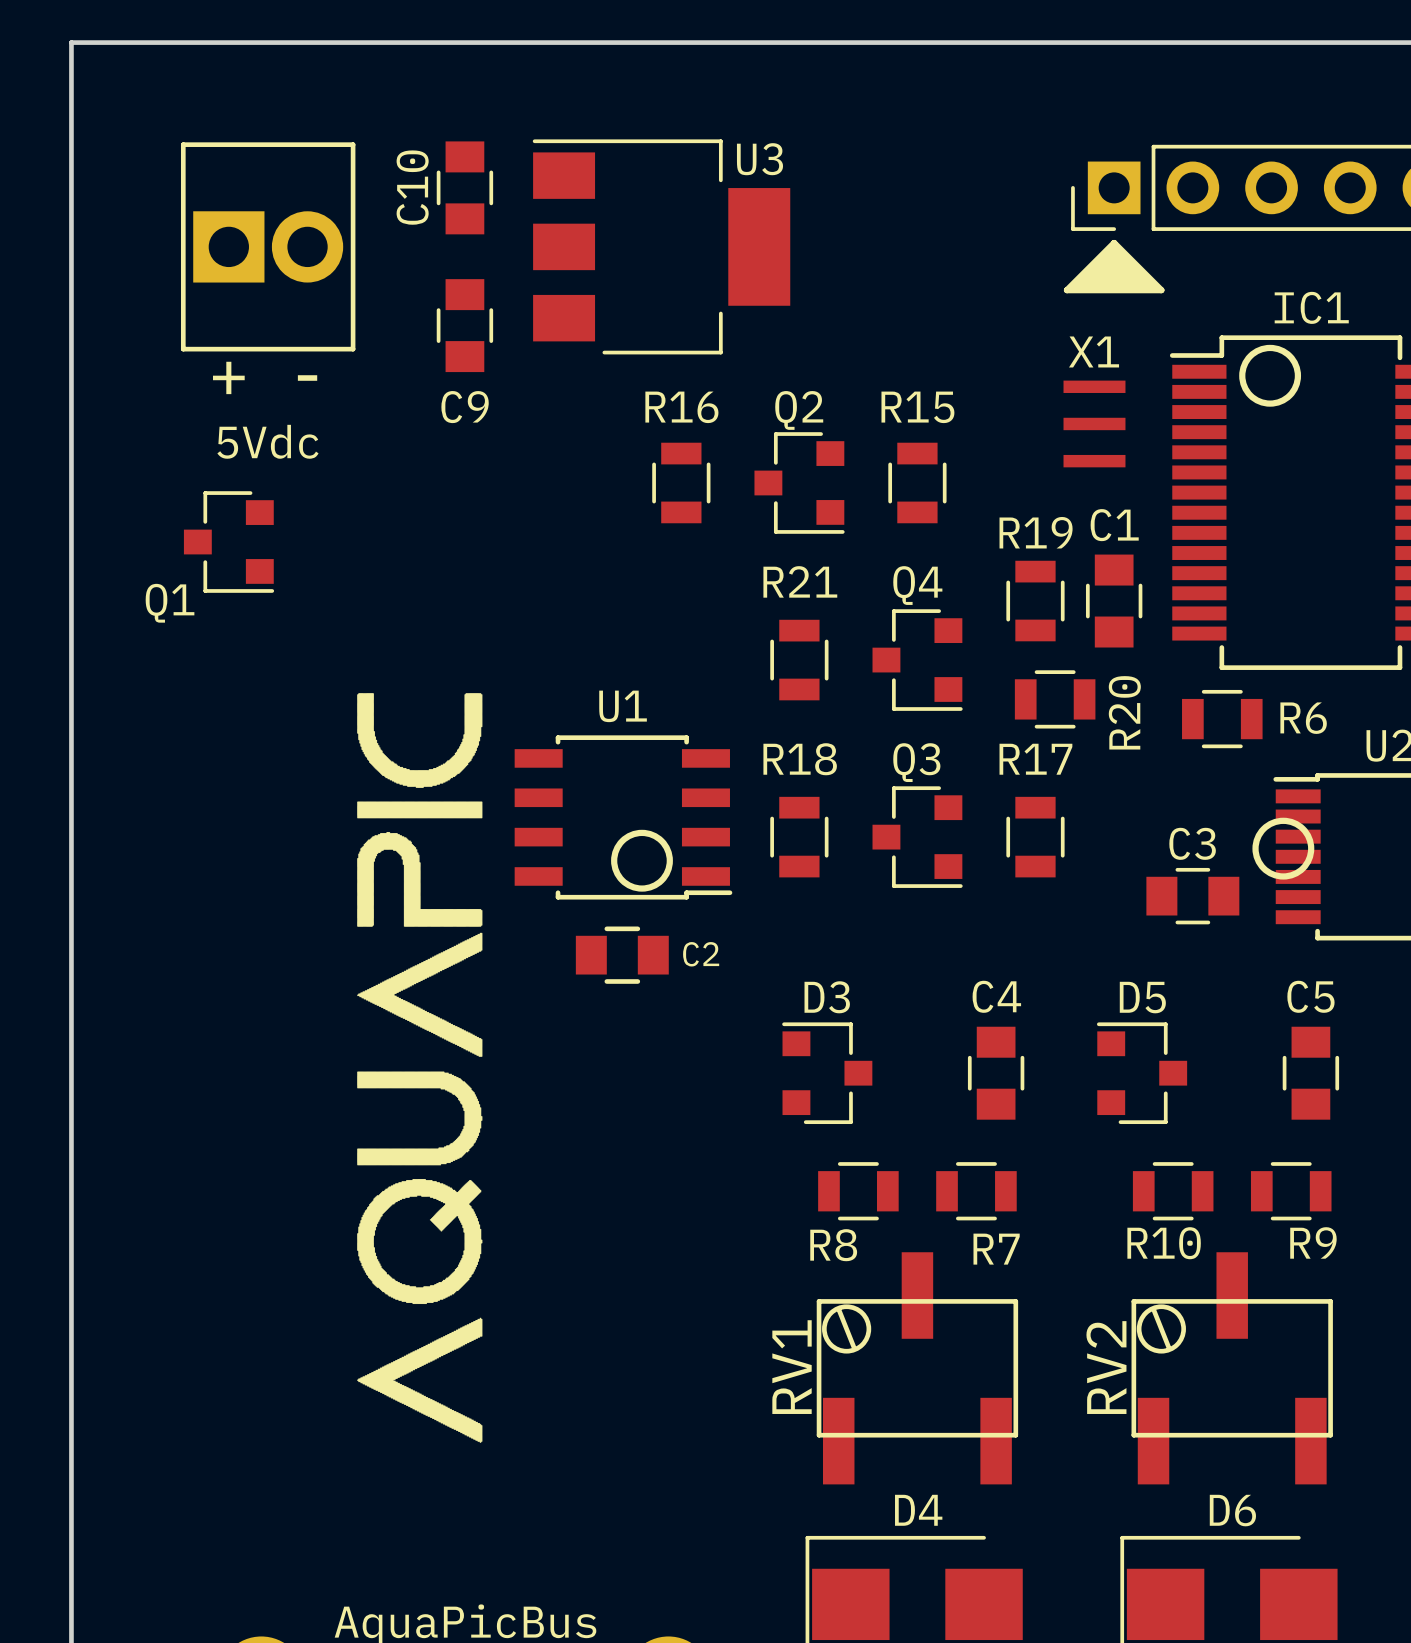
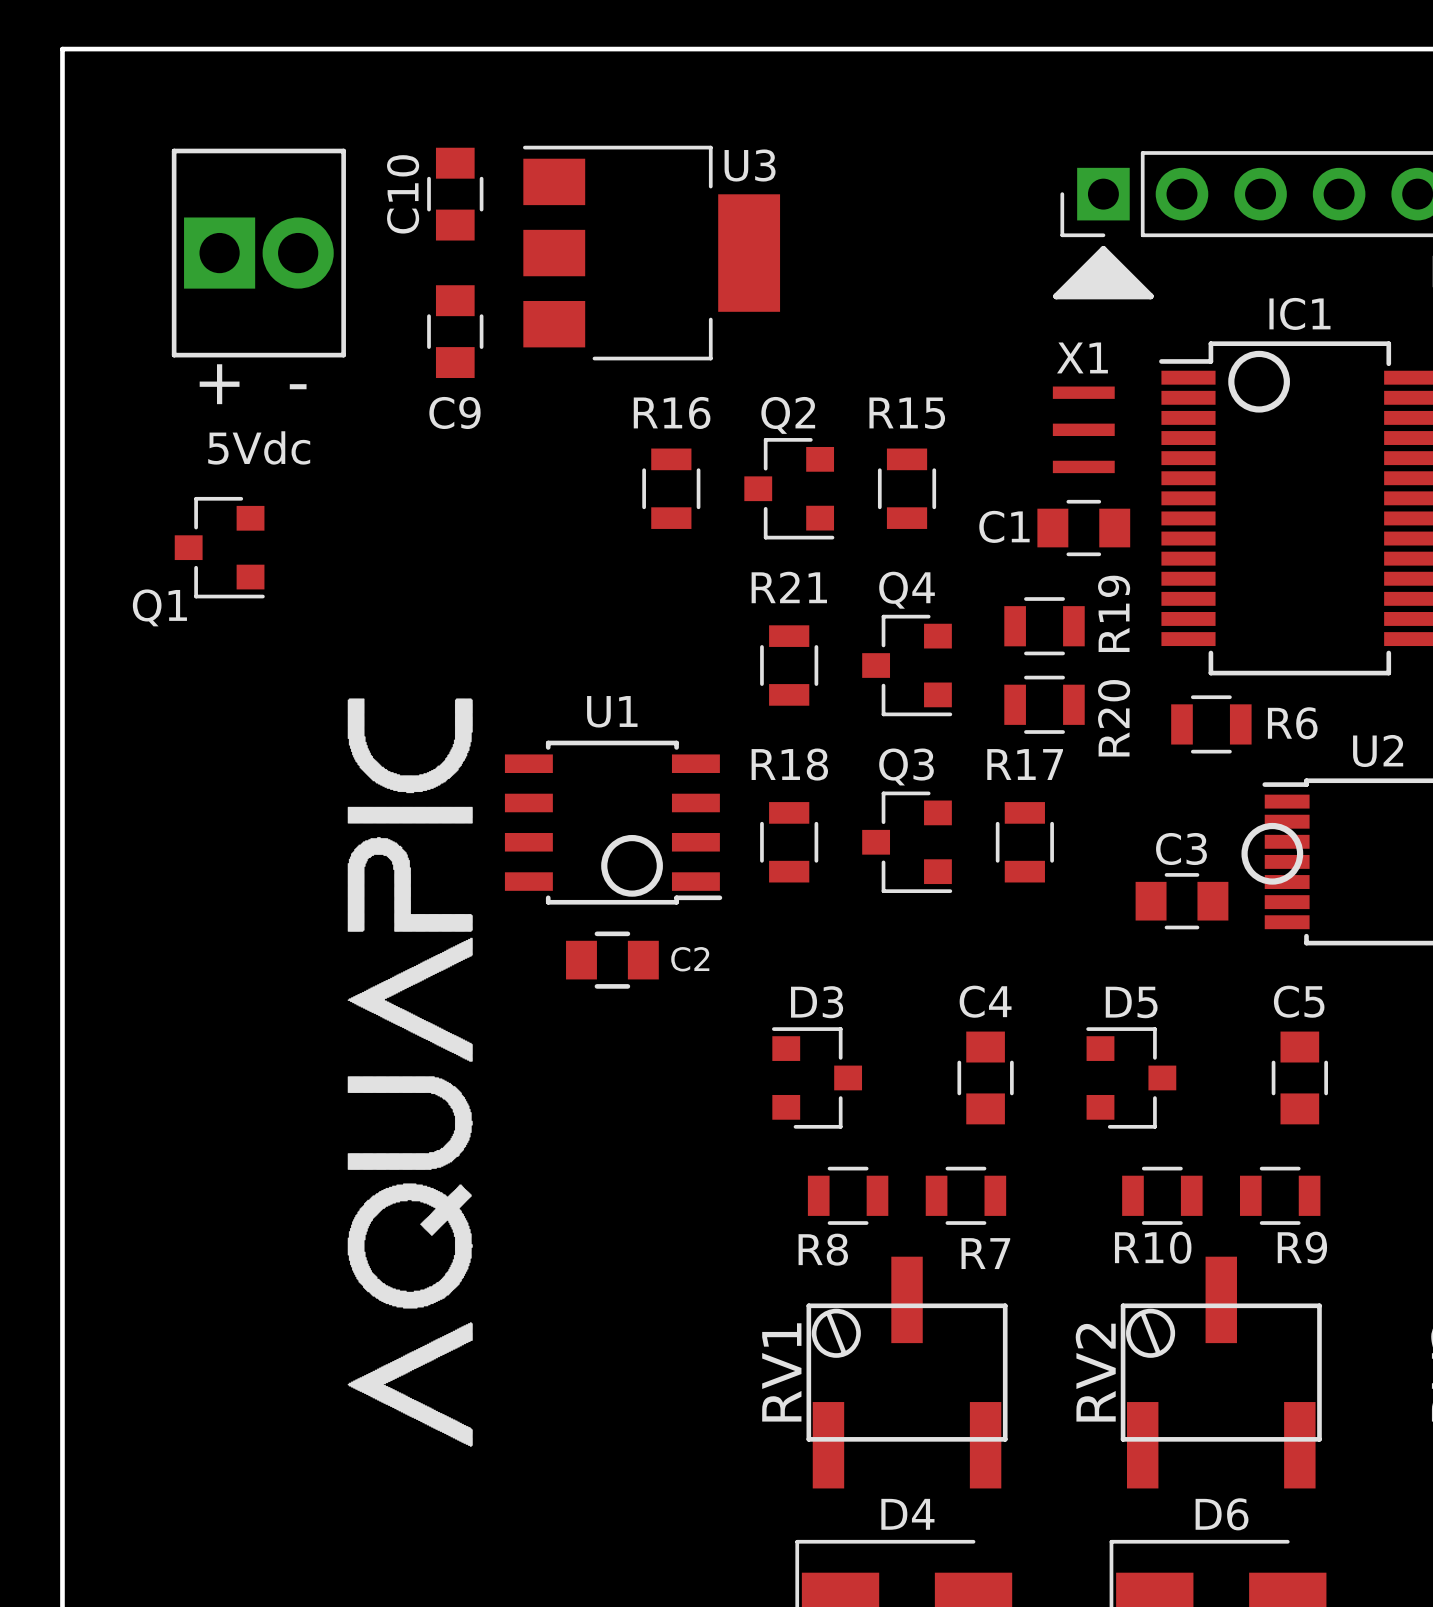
C1 name position: C1 (1114, 525) -> C1 (1004, 526)
R19 rotation: 0° (1035, 601) -> 90° clockwise (1044, 626)
C1 rotation: 0° (1114, 601) -> 90° clockwise (1083, 528)
C1 position: (1114, 601) -> (1083, 528)

